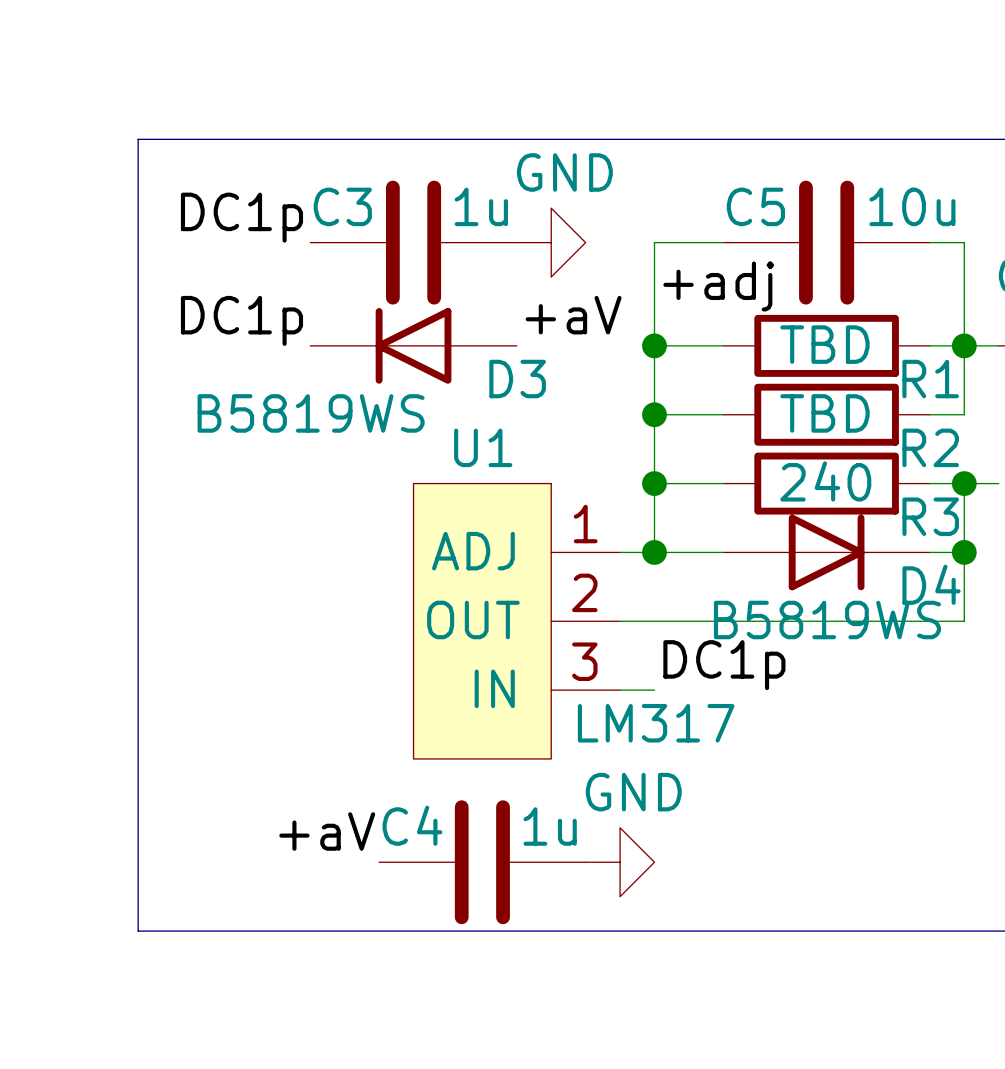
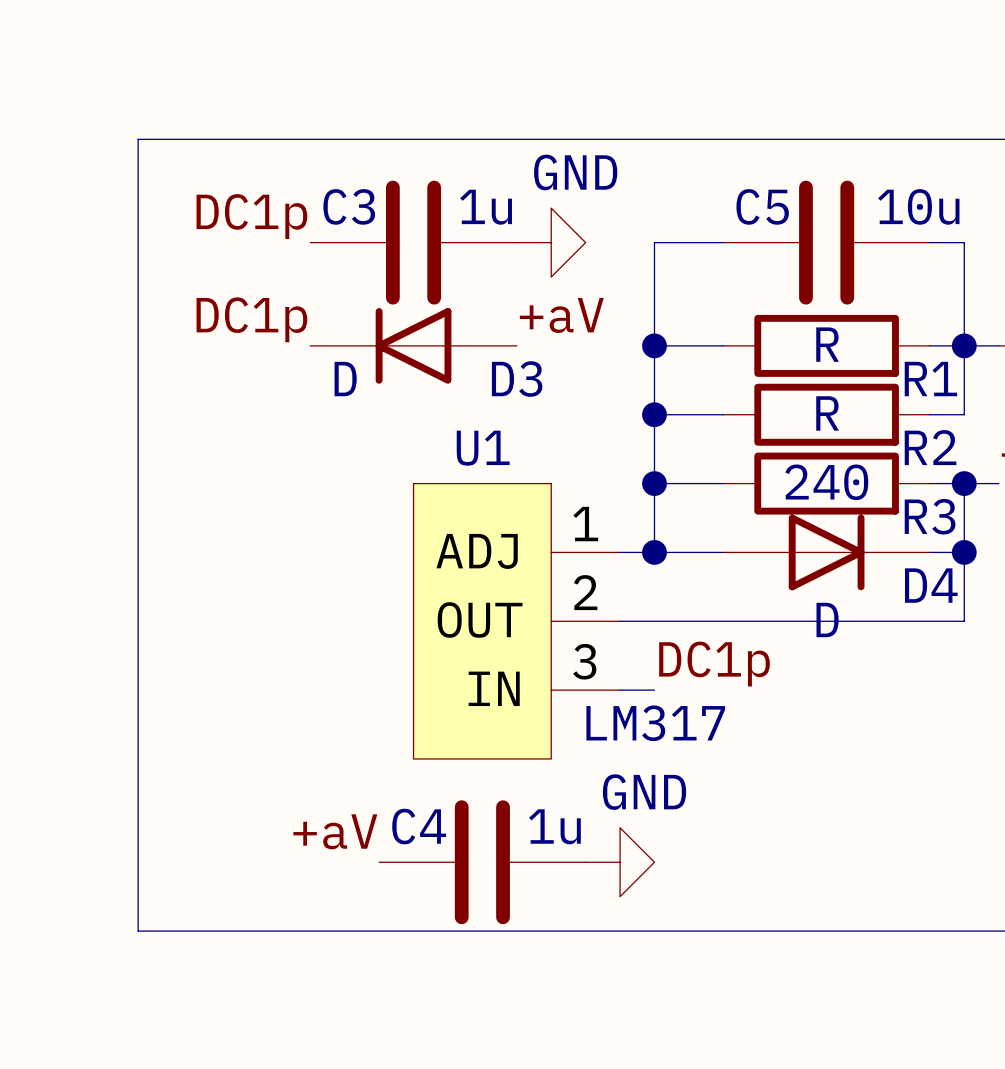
label: +adj (718, 286) -> none
R1 value: TBD (824, 344) -> R (827, 344)
D3 value: B5819WS (311, 413) -> D (345, 379)
R2 value: TBD (824, 413) -> R (827, 413)
D4 value: B5819WS (827, 619) -> D (827, 619)

